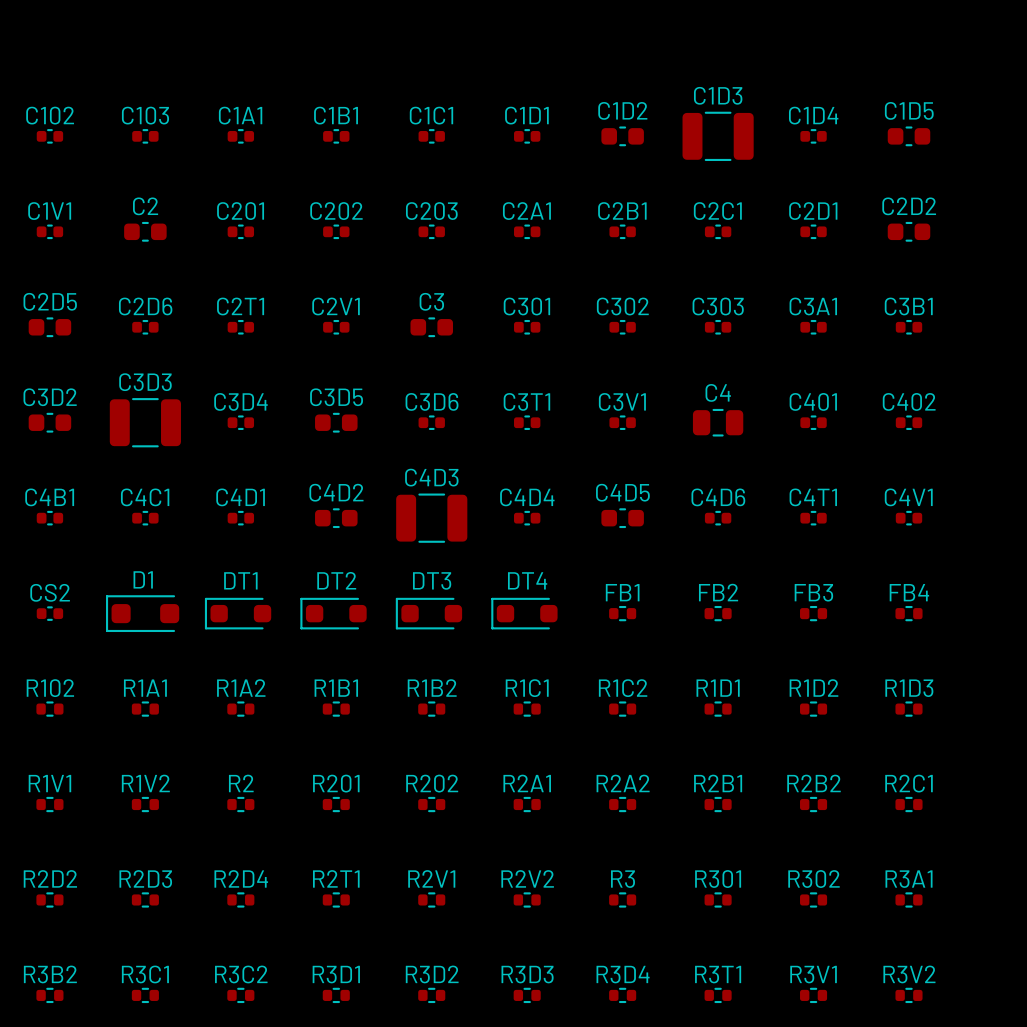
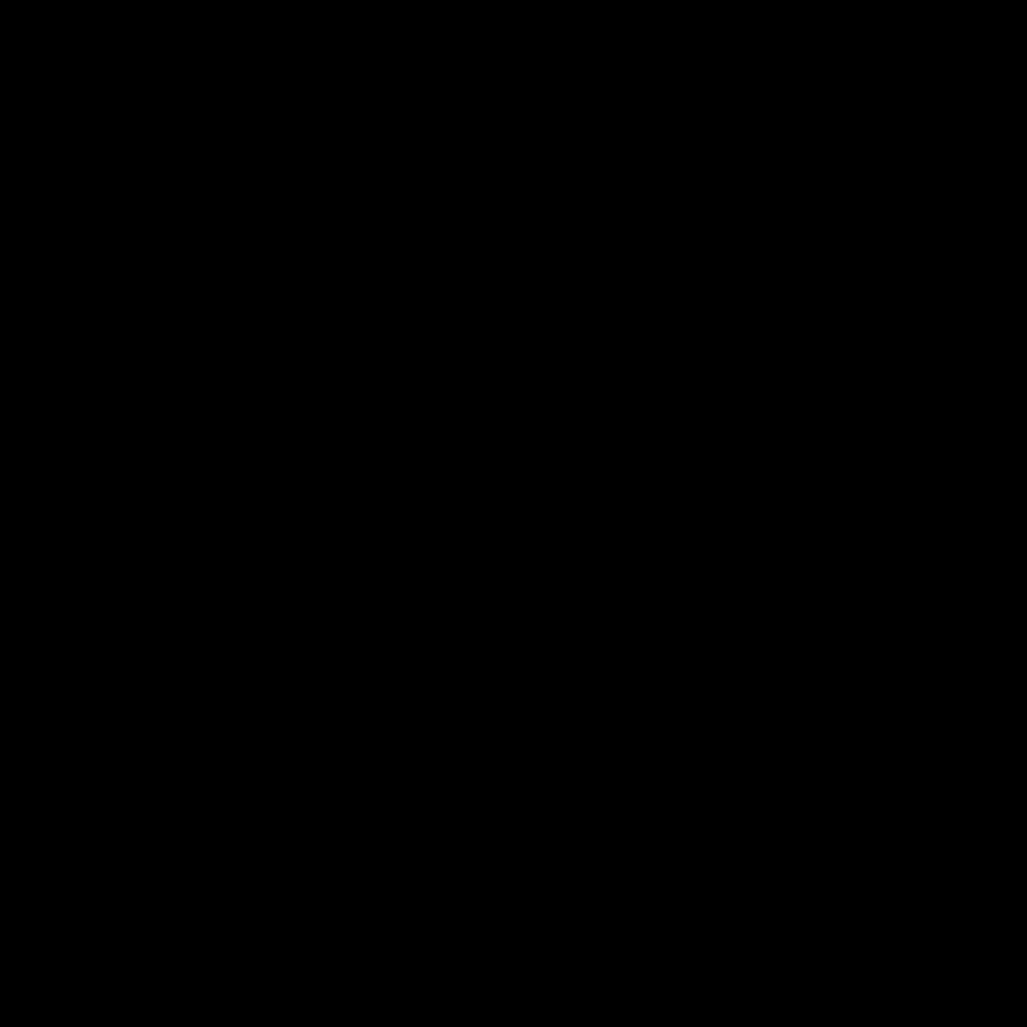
C102: (49, 136) -> none
C103: (145, 136) -> none
C1A1: (240, 136) -> none
C1B1: (336, 136) -> none
C1C1: (431, 136) -> none
C1D1: (527, 136) -> none
C1D2: (622, 136) -> none
C1D3: (718, 136) -> none
C1D4: (813, 136) -> none
C1D5: (909, 136) -> none
C1V1: (49, 231) -> none
C2: (145, 231) -> none
C201: (240, 231) -> none
C202: (336, 231) -> none
C203: (431, 231) -> none
C2A1: (527, 231) -> none
C2B1: (622, 231) -> none
C2C1: (718, 231) -> none
C2D1: (813, 231) -> none
C2D2: (909, 231) -> none
C2D5: (49, 327) -> none
C2D6: (145, 327) -> none
C2T1: (240, 327) -> none
C2V1: (336, 327) -> none
C3: (431, 327) -> none
C301: (527, 327) -> none
C302: (622, 327) -> none
C303: (718, 327) -> none
C3A1: (813, 327) -> none
C3B1: (909, 327) -> none
C3D2: (49, 422) -> none
C3D3: (145, 422) -> none
C3D4: (240, 422) -> none
C3D5: (336, 422) -> none
C3D6: (431, 422) -> none
C3T1: (527, 422) -> none
C3V1: (622, 422) -> none
C4: (718, 422) -> none
C401: (813, 422) -> none
C402: (909, 422) -> none
C4B1: (49, 518) -> none
C4C1: (145, 518) -> none
C4D1: (240, 518) -> none
C4D2: (336, 518) -> none
C4D3: (431, 518) -> none
C4D4: (527, 518) -> none
C4D5: (622, 518) -> none
C4D6: (718, 518) -> none
C4T1: (813, 518) -> none
C4V1: (909, 518) -> none
CS2: (49, 613) -> none
D1: (142, 613) -> none
DT1: (238, 613) -> none
DT2: (333, 613) -> none
DT3: (428, 613) -> none
DT4: (524, 613) -> none
FB1: (622, 613) -> none
FB2: (718, 613) -> none
FB3: (813, 613) -> none
FB4: (909, 613) -> none
R102: (49, 709) -> none
R1A1: (145, 709) -> none
R1A2: (240, 709) -> none
R1B1: (336, 709) -> none
R1B2: (431, 709) -> none
R1C1: (527, 709) -> none
R1C2: (622, 709) -> none
R1D1: (718, 709) -> none
R1D2: (813, 709) -> none
R1D3: (909, 709) -> none
R1V1: (49, 804) -> none
R1V2: (145, 804) -> none
R2: (240, 804) -> none
R201: (336, 804) -> none
R202: (431, 804) -> none
R2A1: (527, 804) -> none
R2A2: (622, 804) -> none
R2B1: (718, 804) -> none
R2B2: (813, 804) -> none
R2C1: (909, 804) -> none
R2D2: (49, 899) -> none
R2D3: (145, 899) -> none
R2D4: (240, 899) -> none
R2T1: (336, 899) -> none
R2V1: (431, 899) -> none
R2V2: (527, 899) -> none
R3: (622, 899) -> none
R301: (718, 899) -> none
R302: (813, 899) -> none
R3A1: (909, 899) -> none
R3B2: (49, 995) -> none
R3C1: (145, 995) -> none
R3C2: (240, 995) -> none
R3D1: (336, 995) -> none
R3D2: (431, 995) -> none
R3D3: (527, 995) -> none
R3D4: (622, 995) -> none
R3T1: (718, 995) -> none
R3V1: (813, 995) -> none
R3V2: (909, 995) -> none

